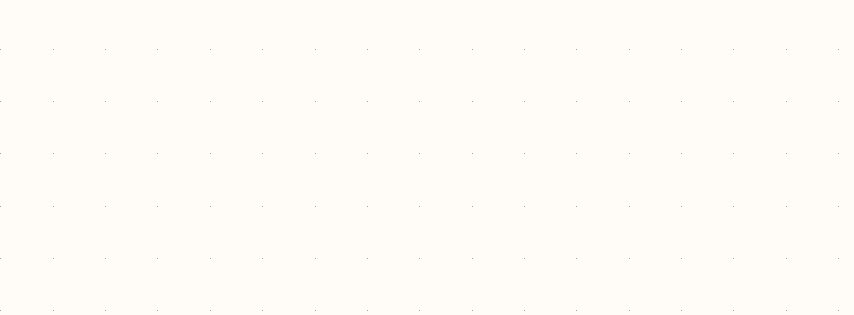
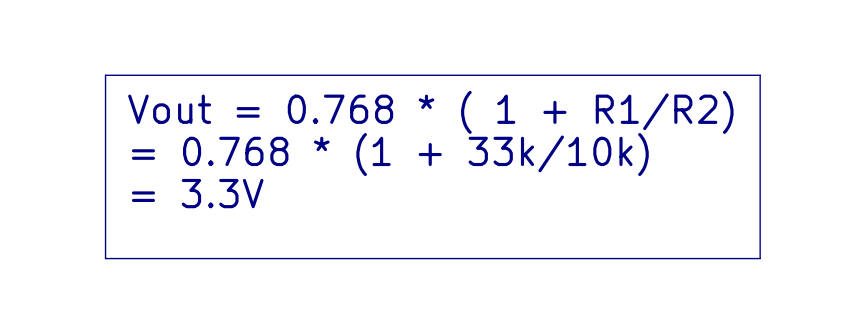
line: none -> (105, 75) (105, 258) (760, 258) (760, 75) (105, 75)
text: none -> Vout = 0.768 * ( 1 + R1/R2) (430, 112)
text: none -> = 0.768 * (1 + 33k/10k) (390, 154)
text: none -> = 3.3V (197, 193)

